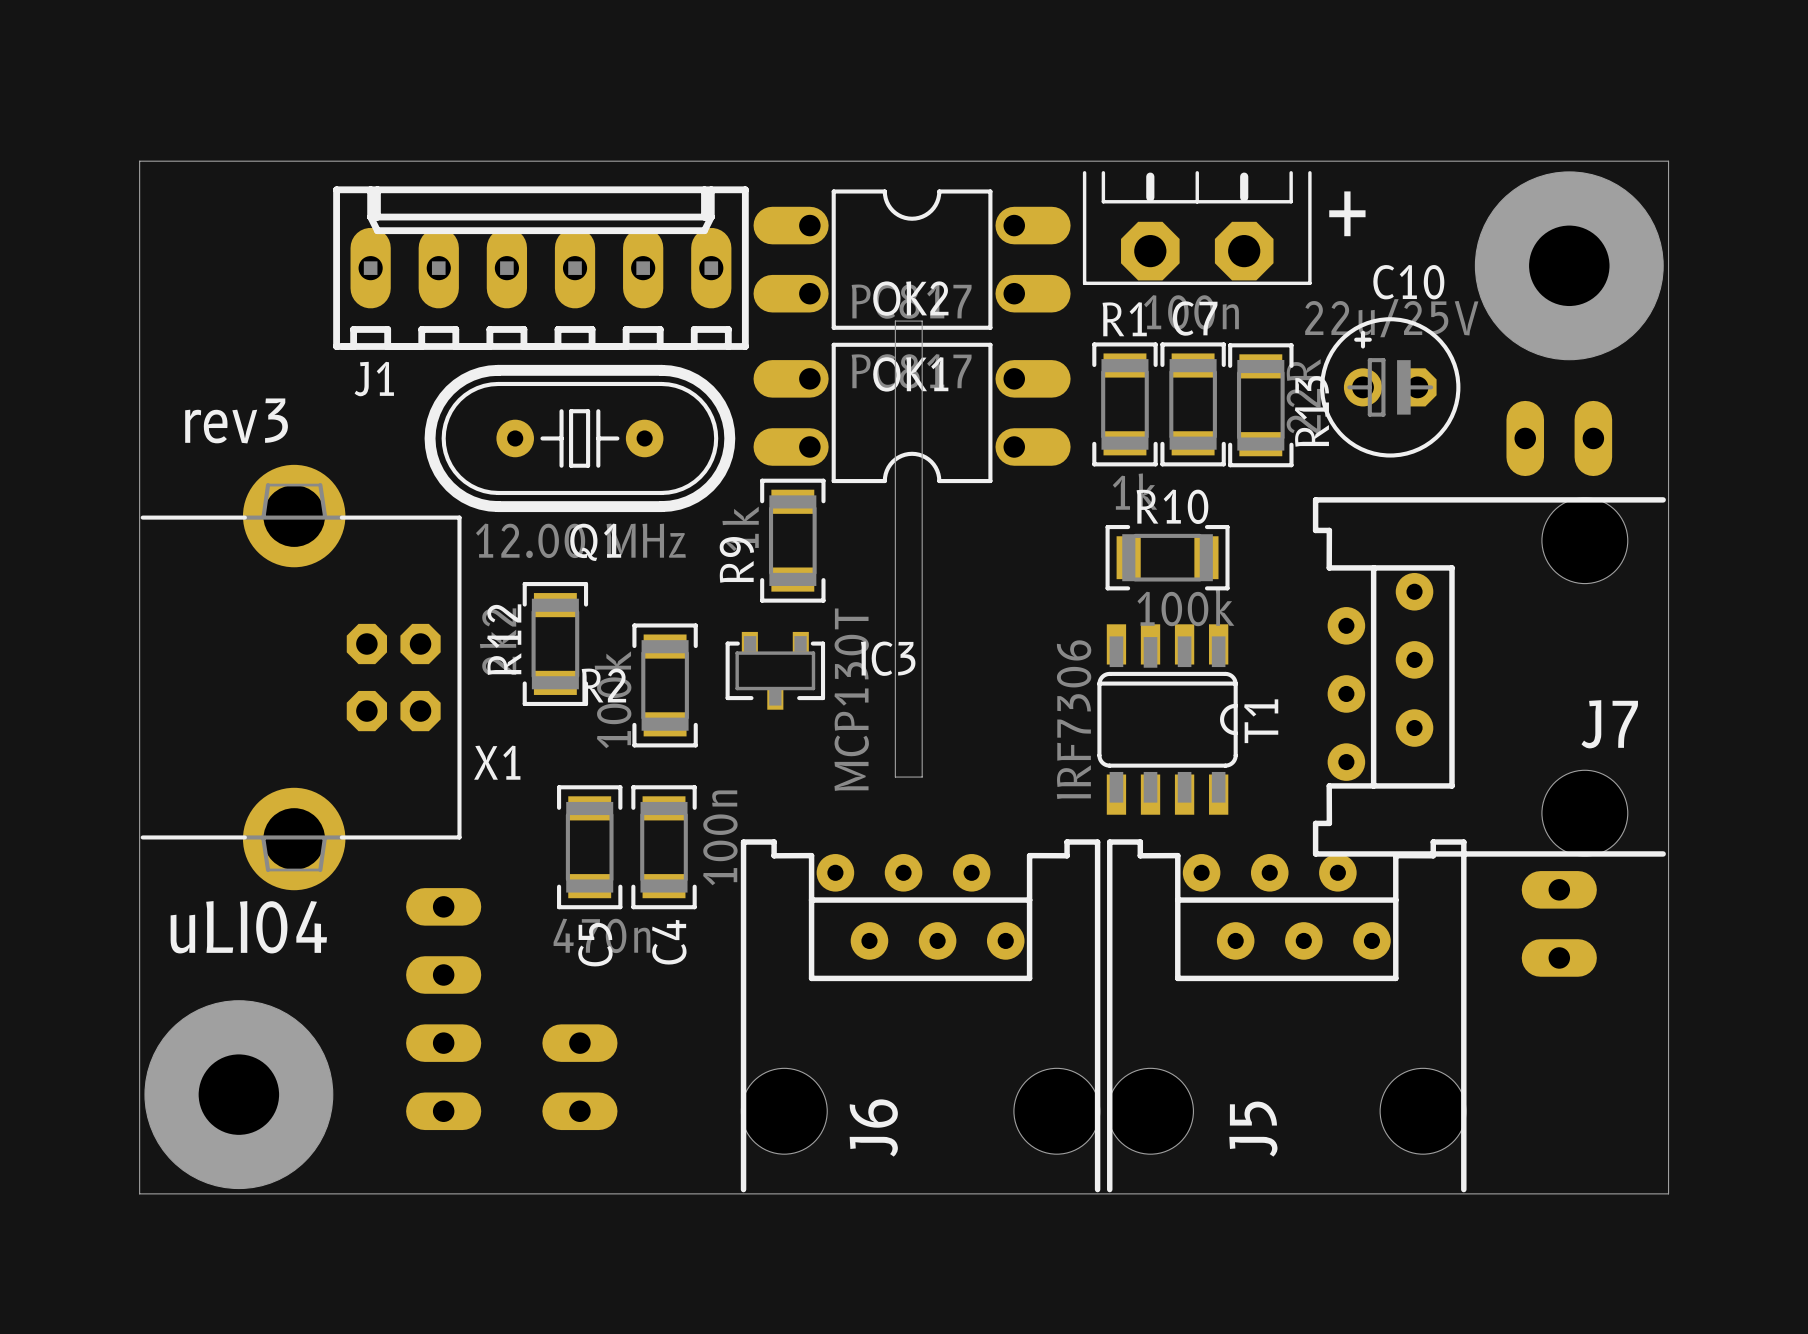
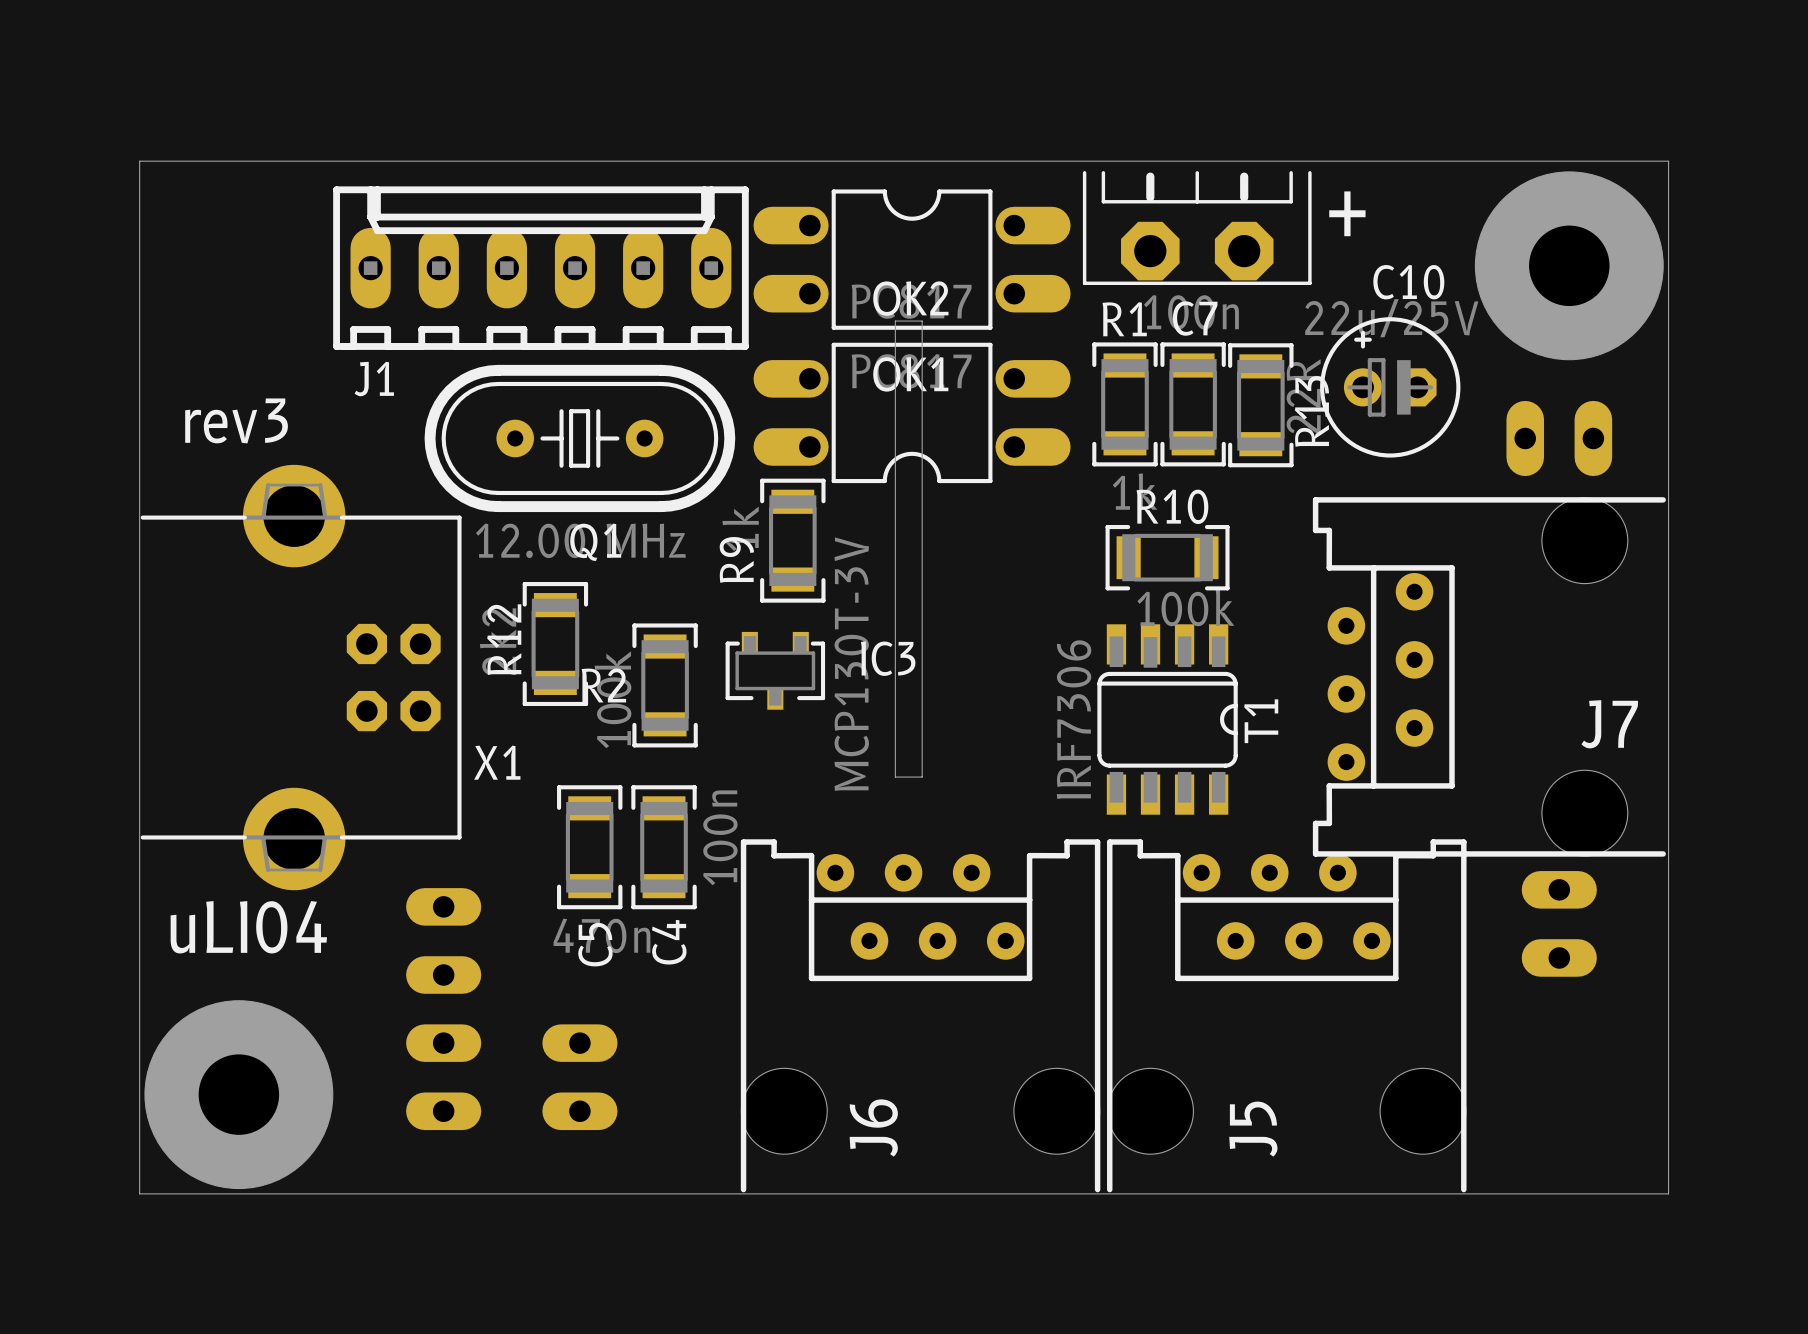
IC3 value: MCP130T (851, 699) -> MCP130T-3V (851, 664)

